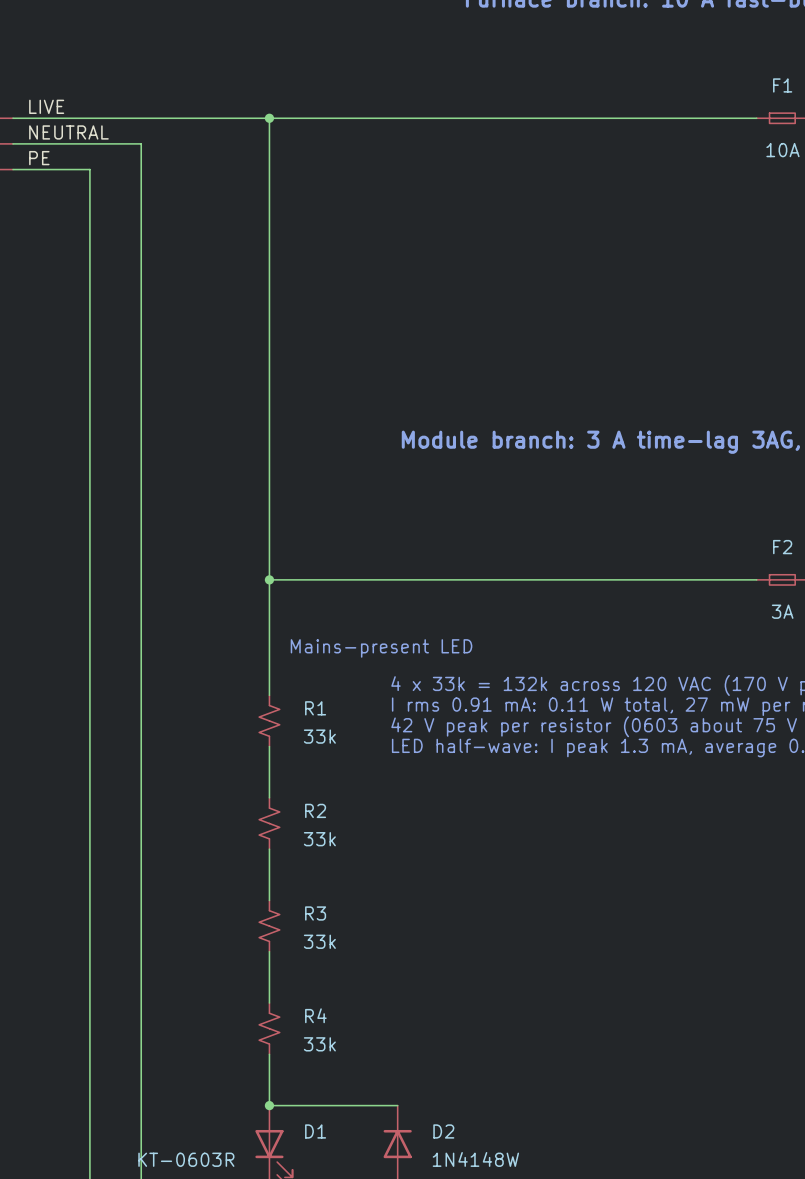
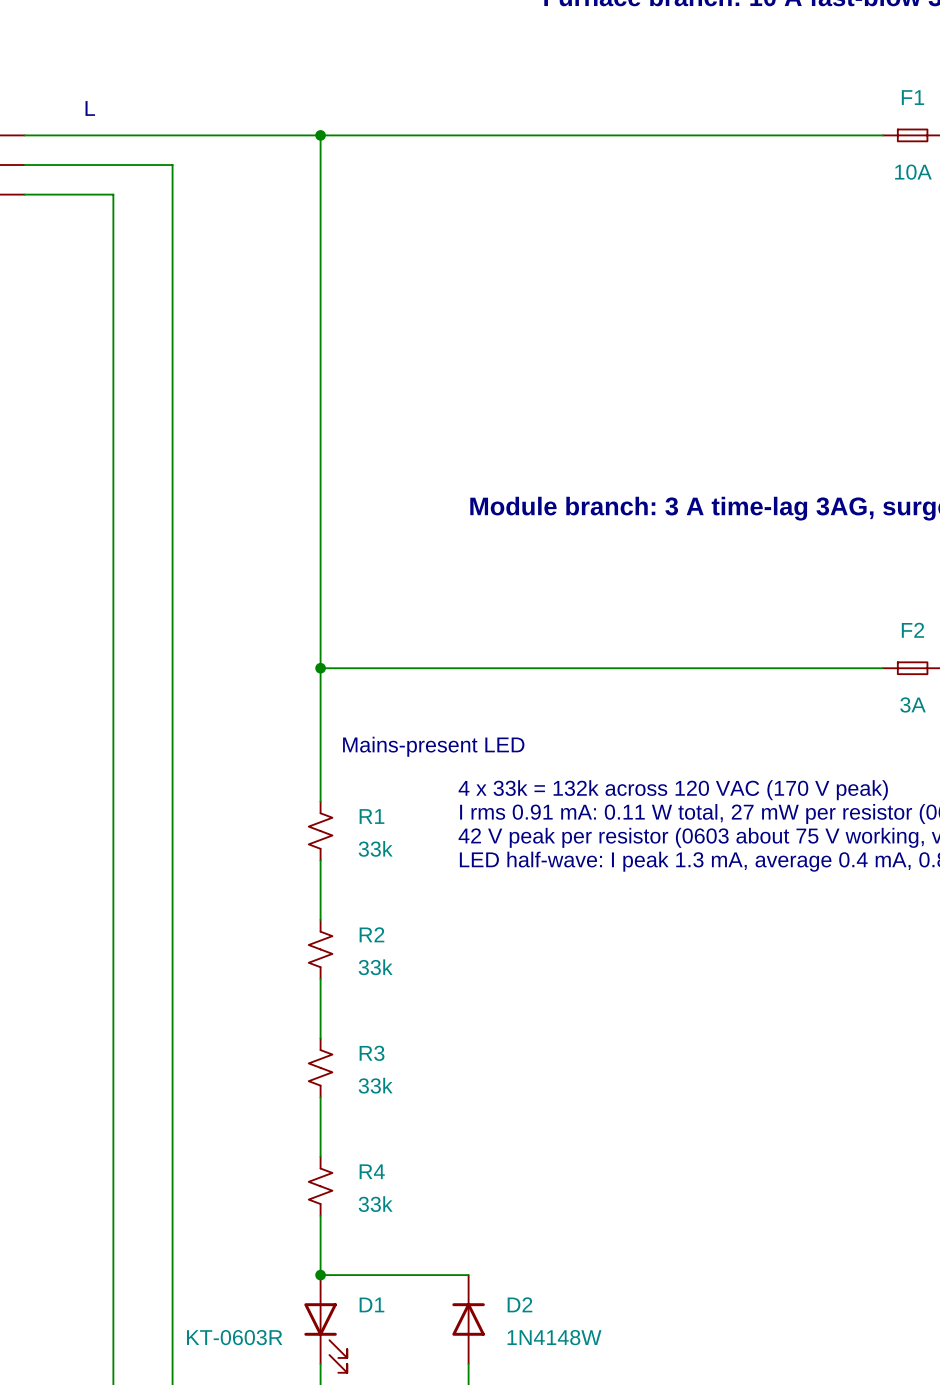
text: none -> L (90, 108)
label: LIVE (46, 106) -> none
label: NEUTRAL (68, 132) -> none
label: PE (39, 158) -> none

